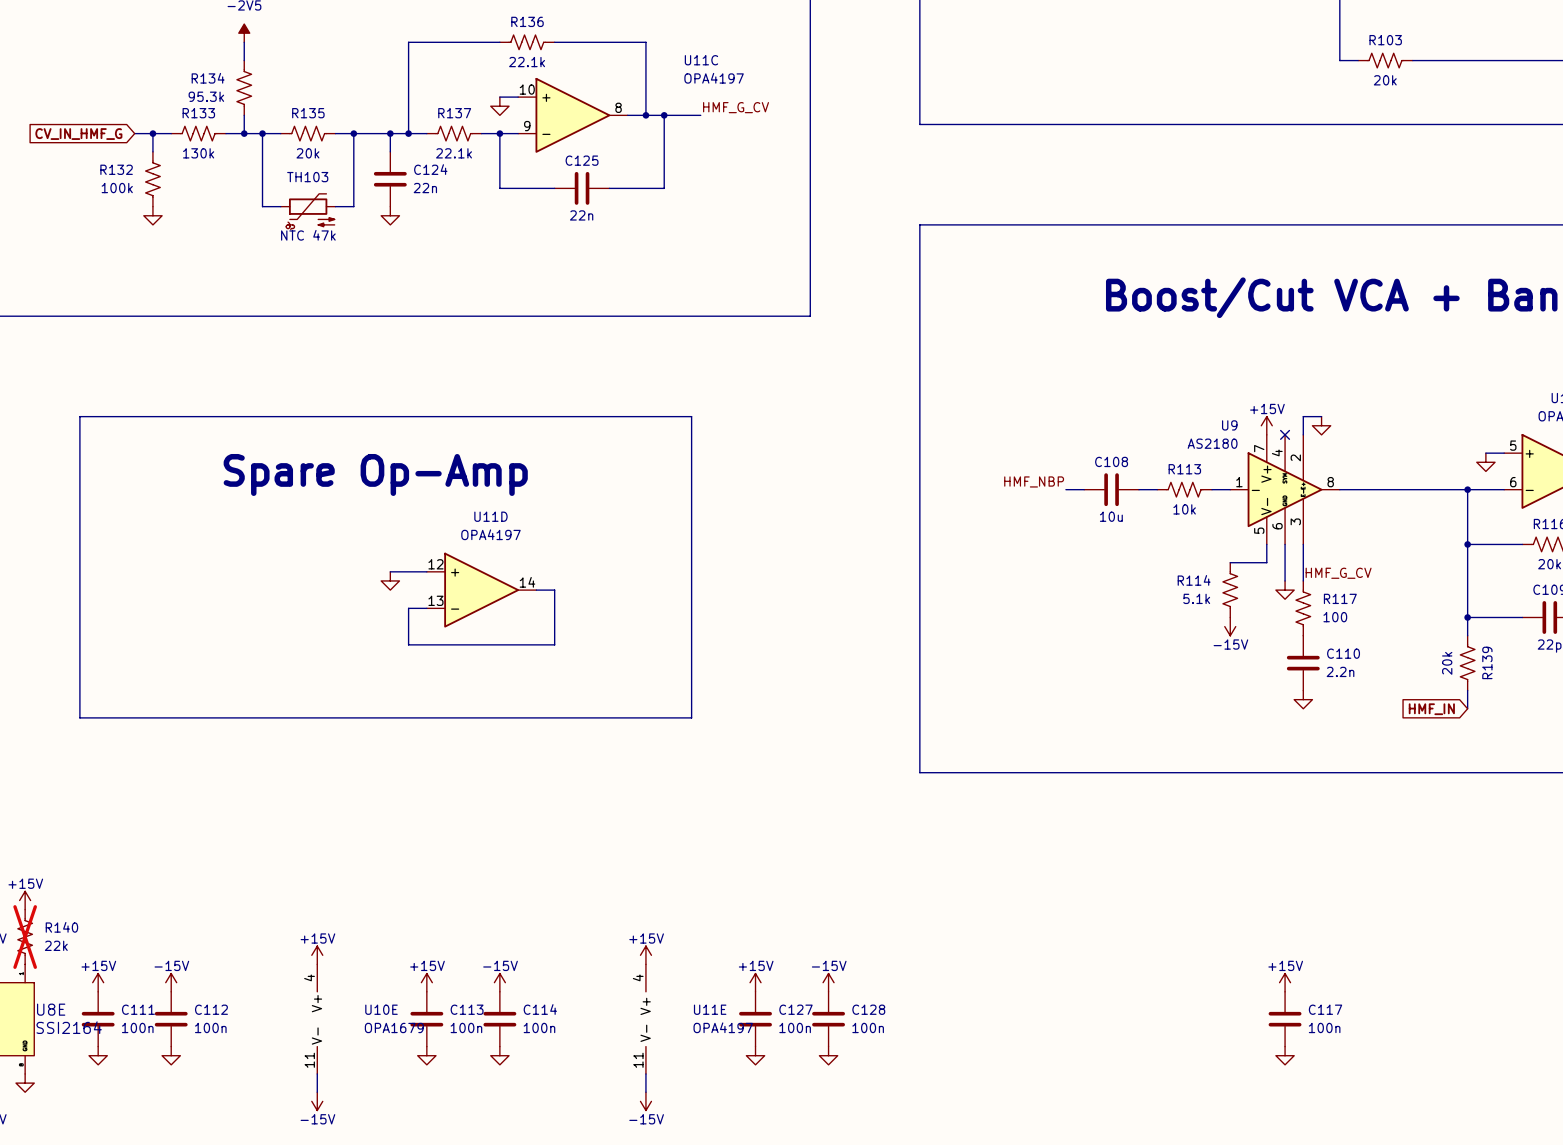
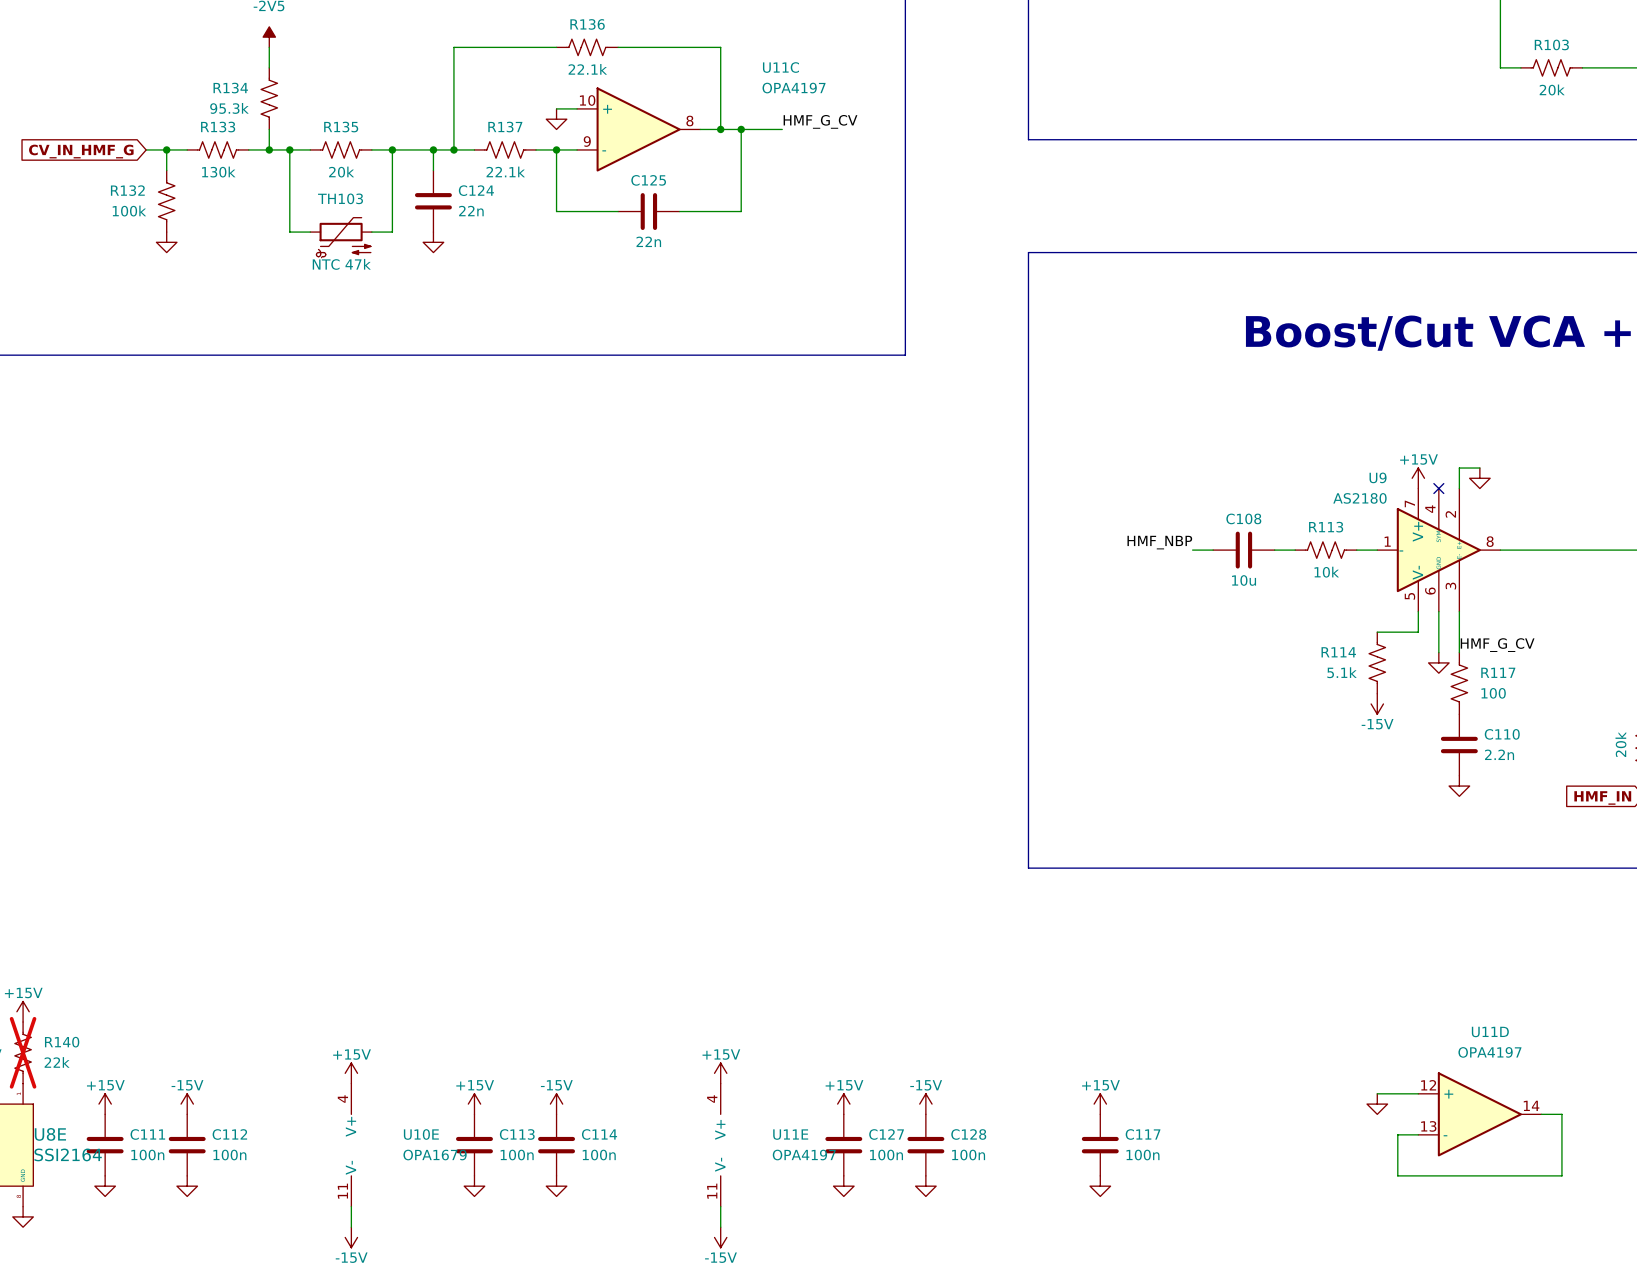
line: (79, 416) (691, 416) (691, 717) (79, 717) (79, 416) -> none
text: Spare Op-Amp (375, 474) -> none
wire: (390, 571) (426, 571) -> none
power symbol: (390, 580) -> none
U11D position: (481, 590) -> (1479, 1114)
wire: (536, 590) (554, 590) (554, 644) (408, 644) (408, 608) (426, 608) -> none
wire: none -> (1377, 1093) (1418, 1093)
power symbol: none -> +15V (1100, 1104)
power symbol: +15V (1285, 982) -> none
wire: none -> (1541, 1114) (1561, 1114) (1561, 1175) (1397, 1175) (1397, 1134) (1418, 1134)
C117 position: (1285, 1019) -> (1100, 1145)
power symbol: none -> (1100, 1186)
power symbol position: (1285, 1055) -> (1377, 1104)

